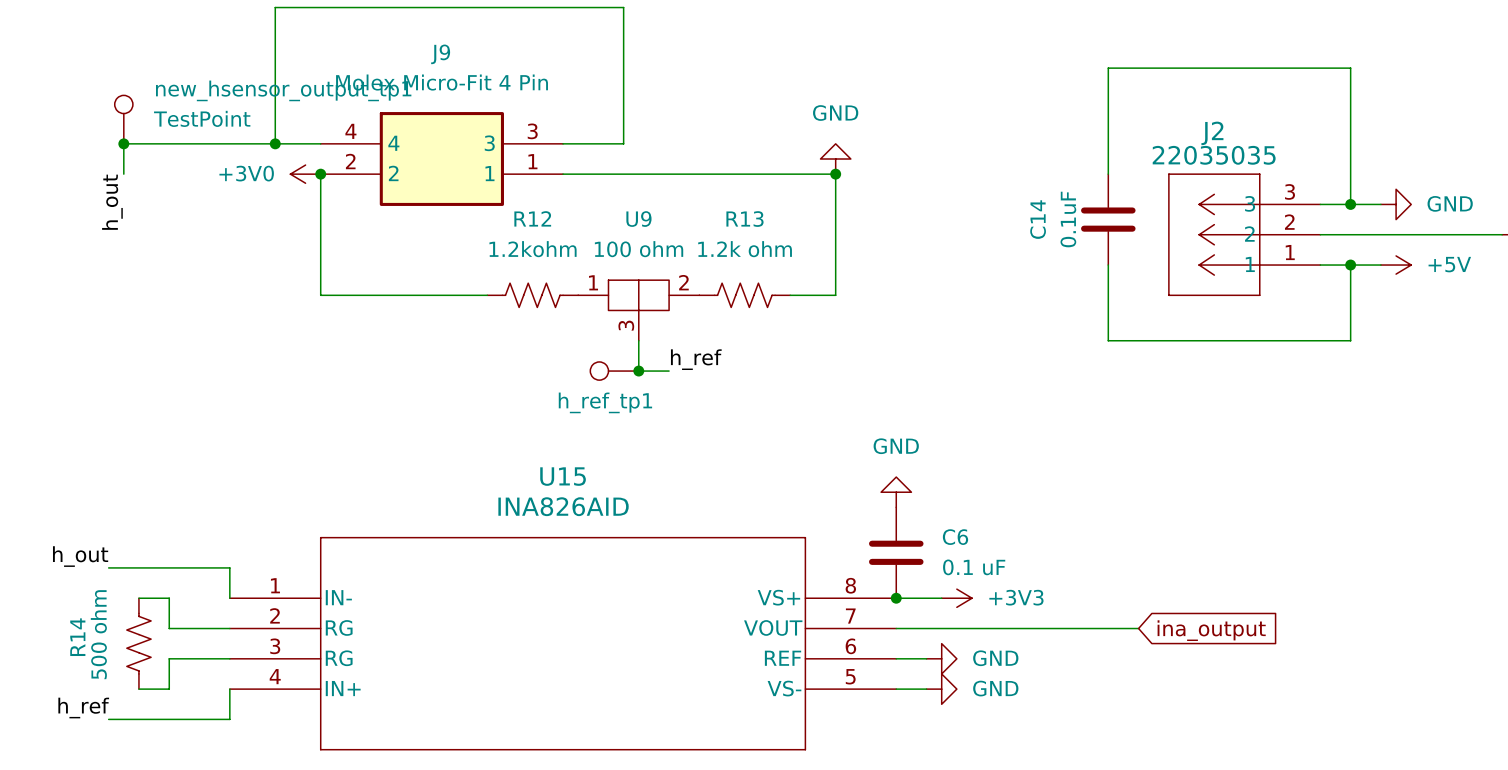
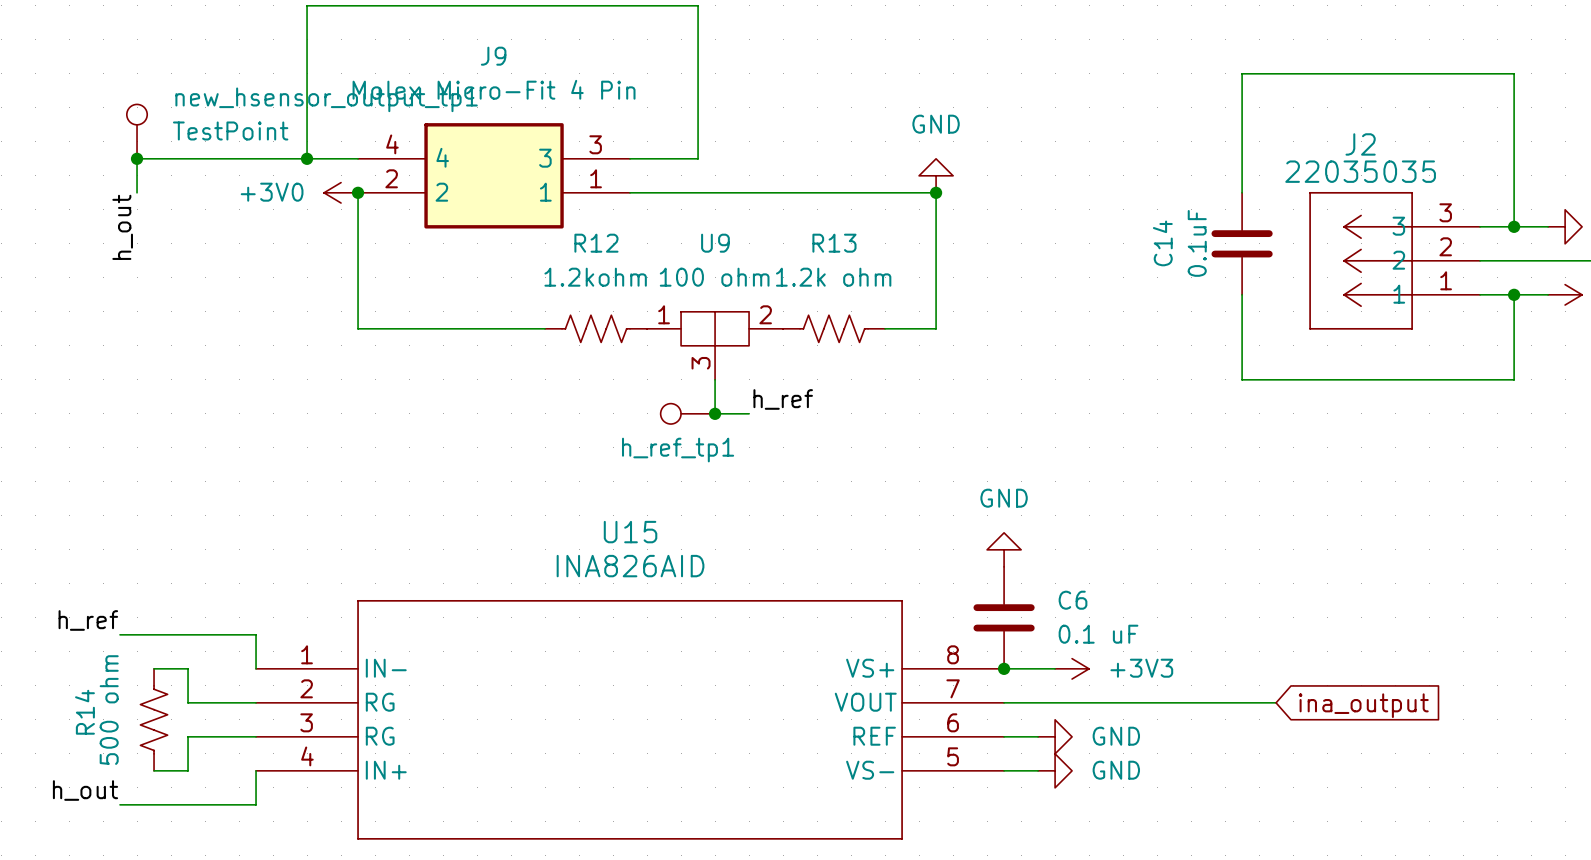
label: h_out (80, 556) -> h_ref (88, 620)
label: h_ref (83, 708) -> h_out (85, 790)

